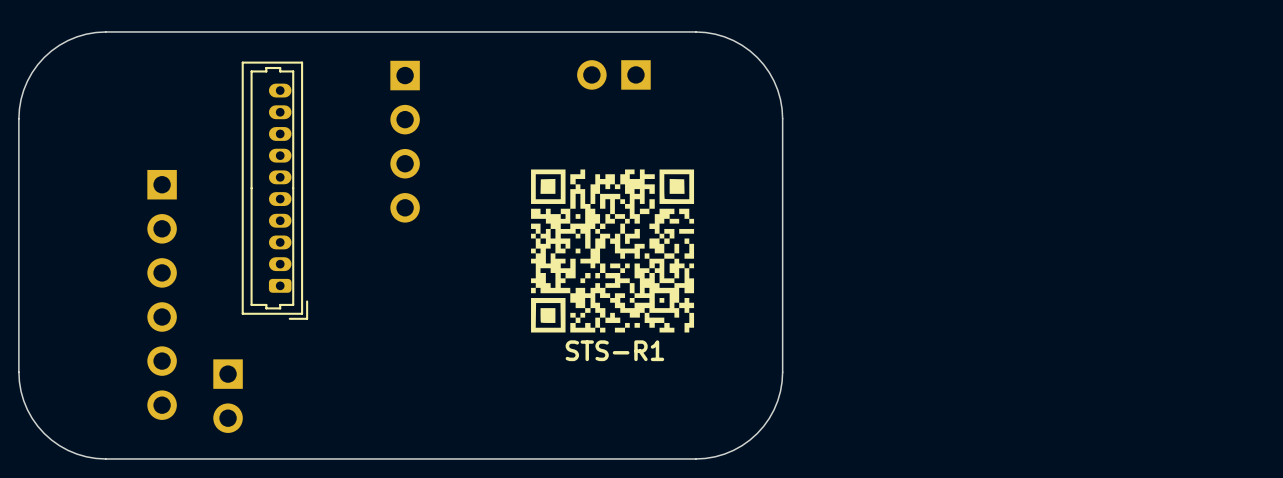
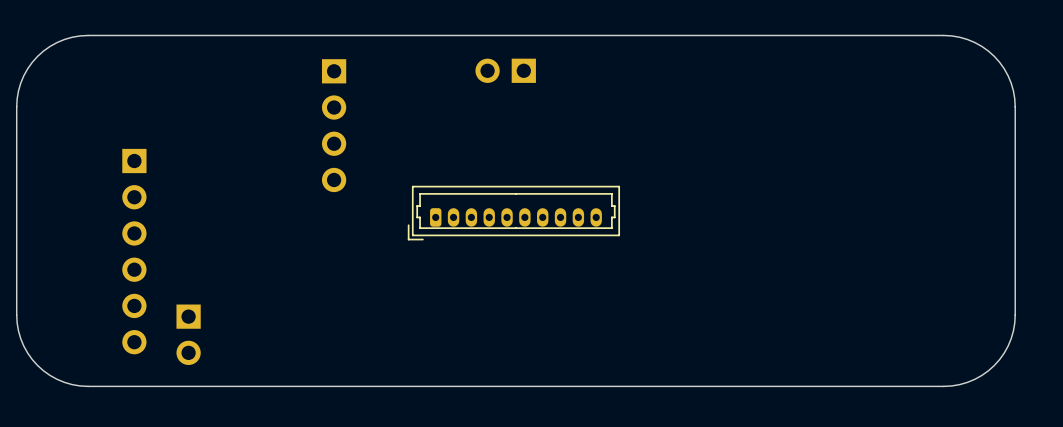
board edge: (695, 31) (715, 34) (733, 40) (757, 57) (769, 72) (777, 90) (782, 118) (782, 372) (780, 391) (769, 418) (749, 440) (724, 454) (695, 458) -> (573, 35) (951, 35) (967, 39) (981, 46) (999, 62) (1011, 83) (1015, 106) (1014, 323) (1011, 338) (1004, 353) (994, 365) (981, 375) (959, 384) (943, 386) (573, 386)
drawing: [531, 169, 695, 333] -> none
part rotation: 0° (274, 190) -> 90° clockwise (513, 213)
part position: (274, 190) -> (513, 213)
text: STS-R1 (614, 350) -> none

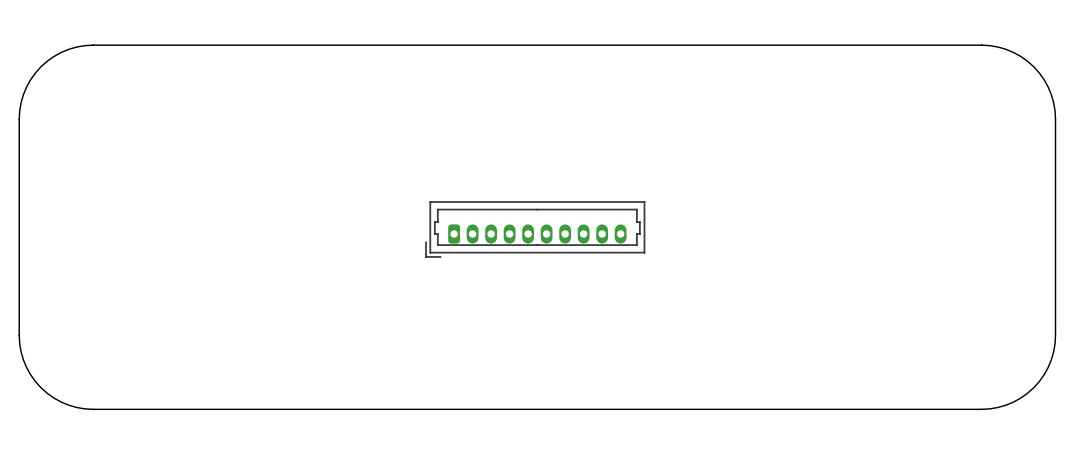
part: (505, 70) -> none
part: (334, 125) -> none
part: (134, 251) -> none
part: (188, 334) -> none

